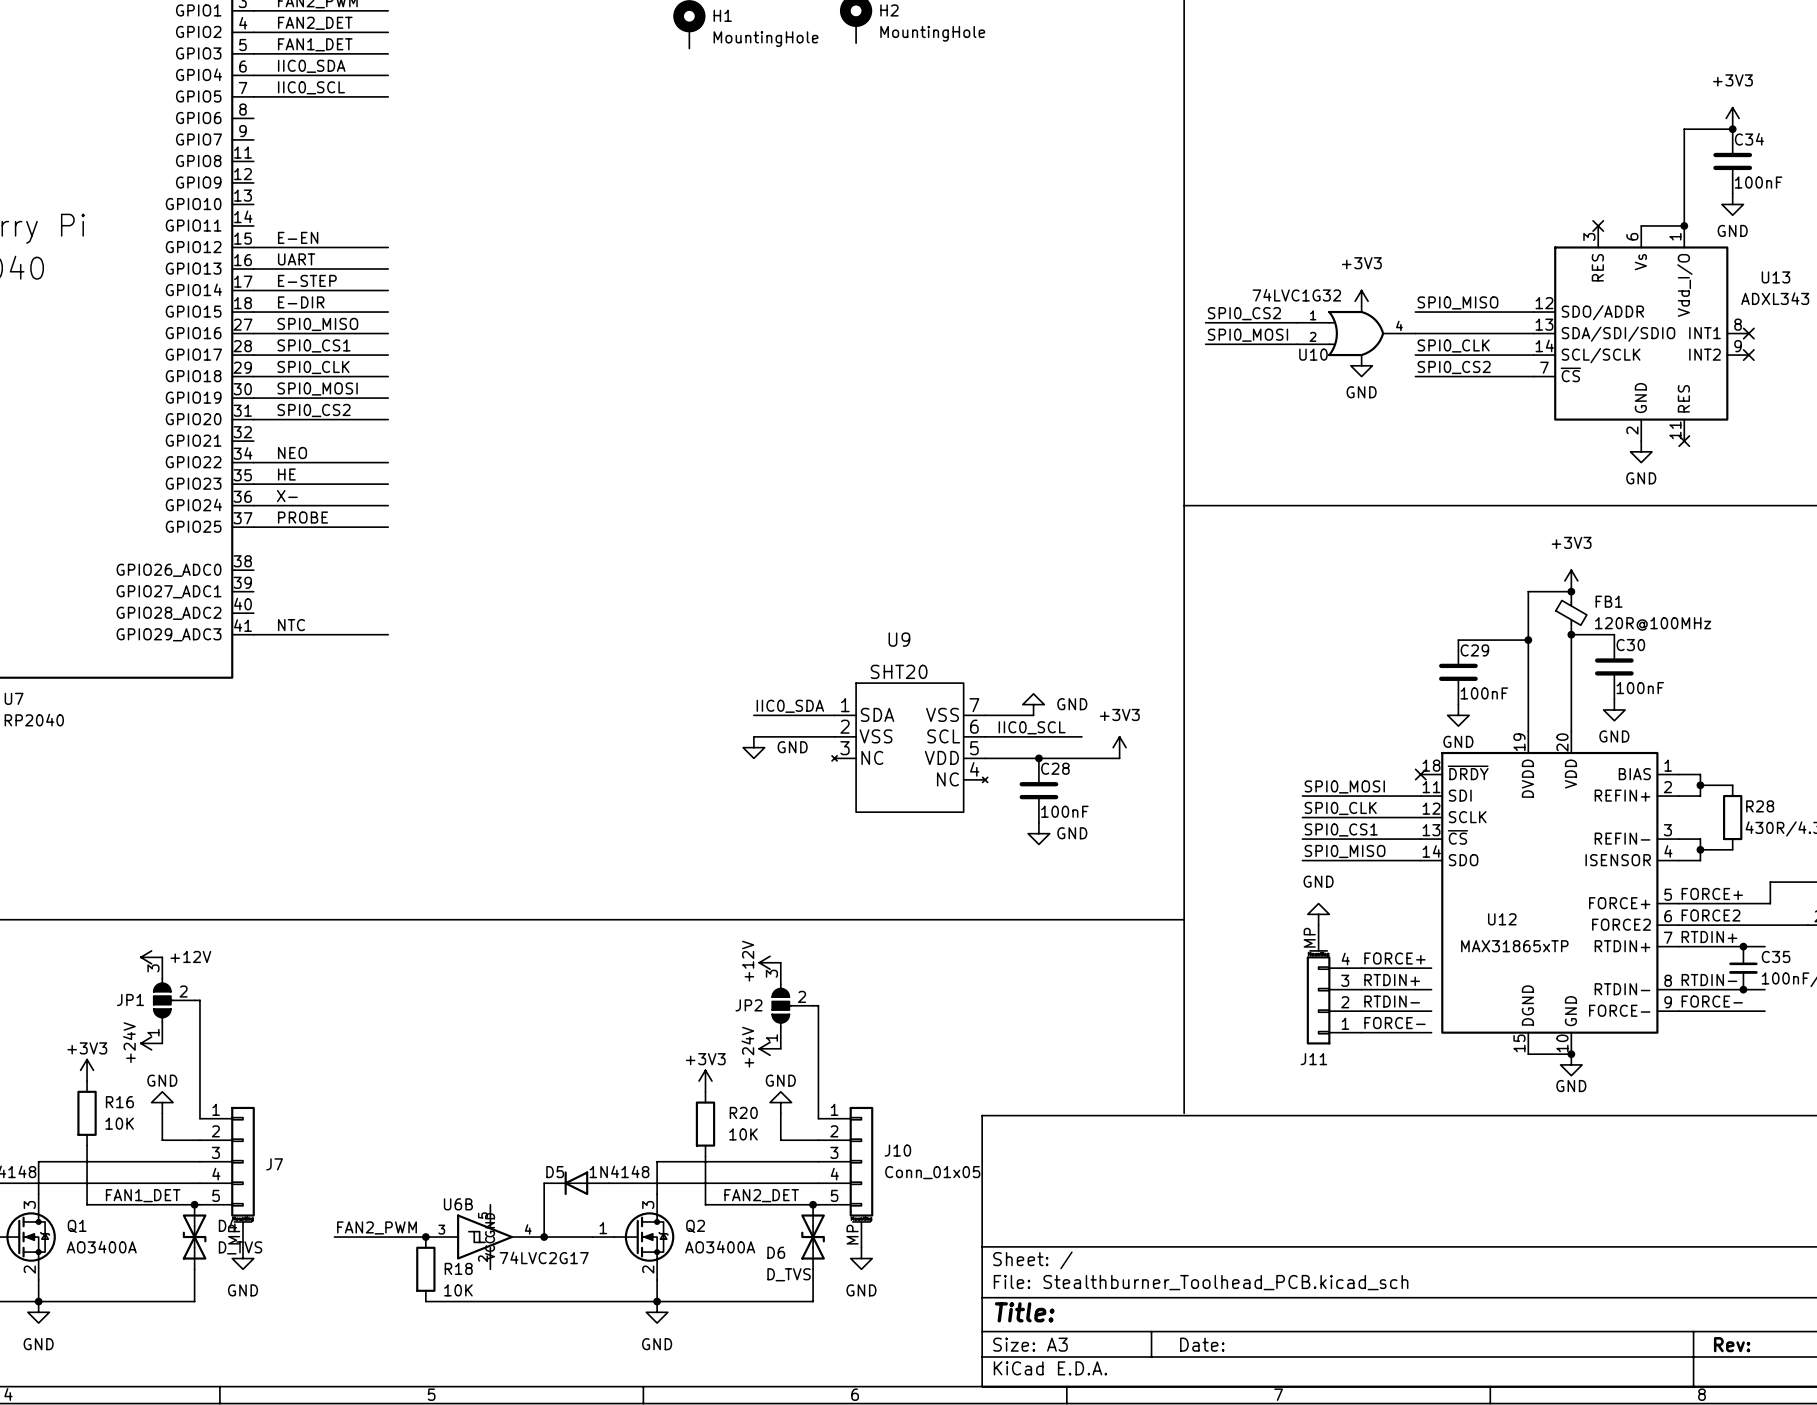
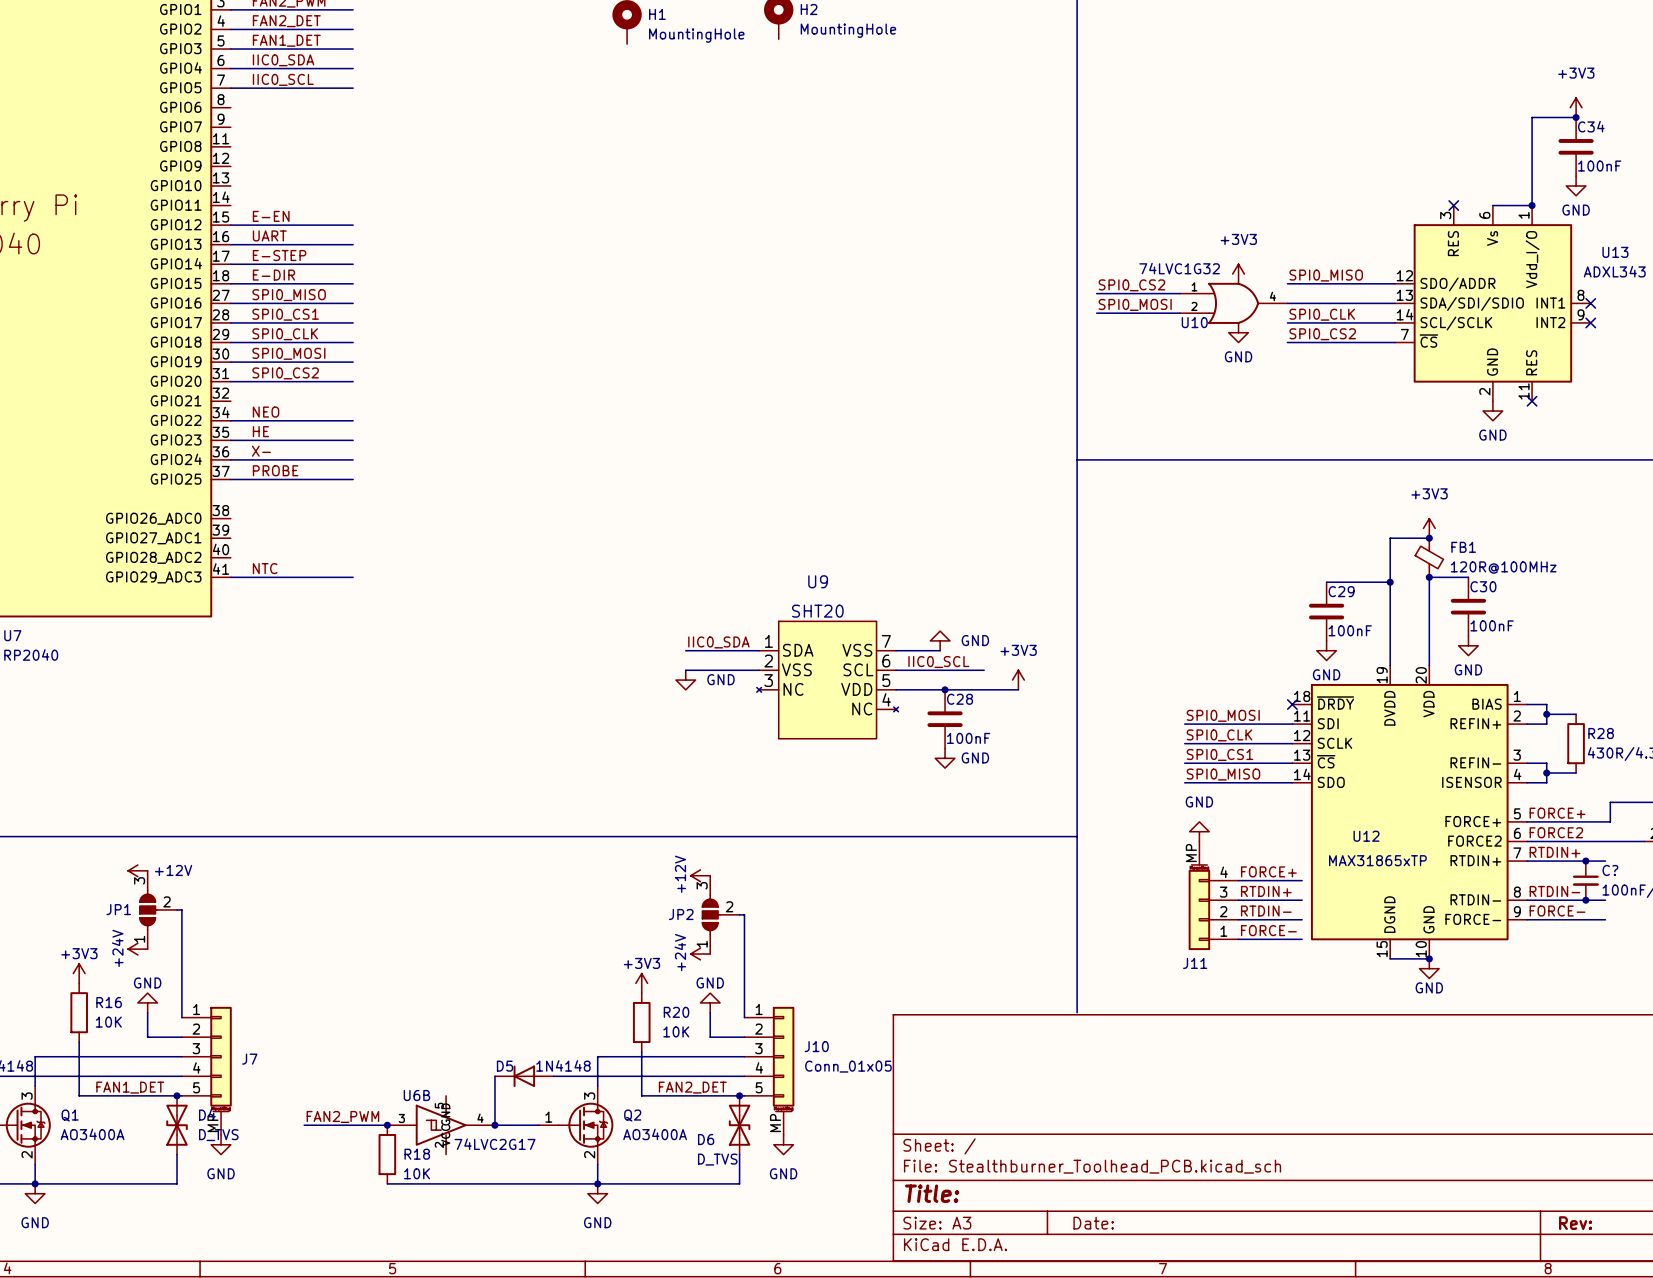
C35 name: C35 (1776, 956) -> C? (1610, 870)

